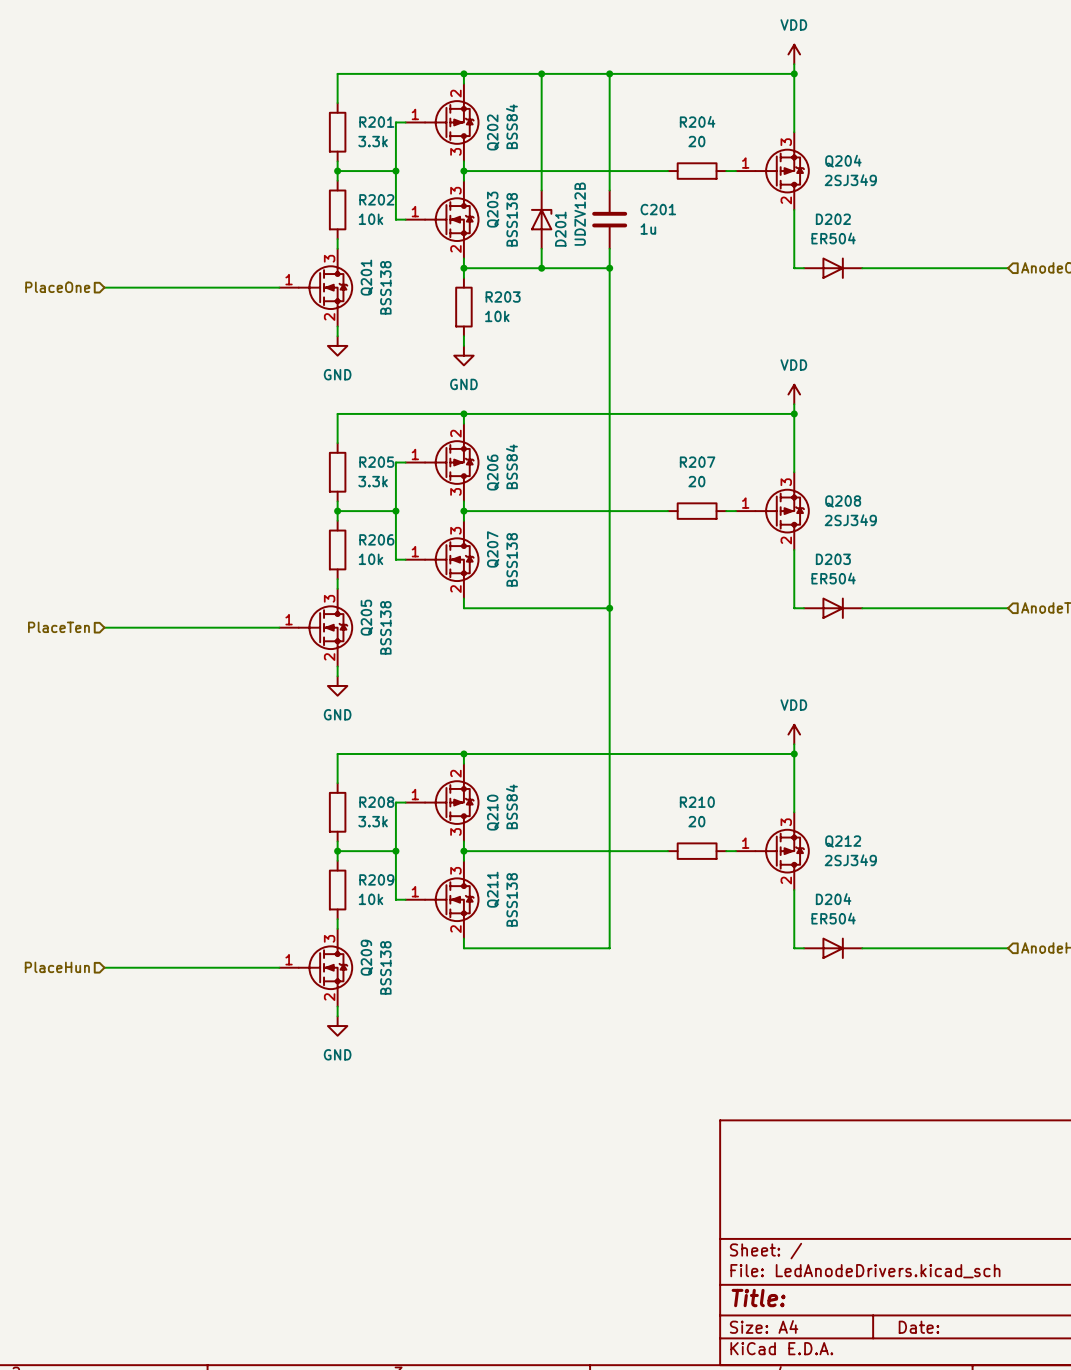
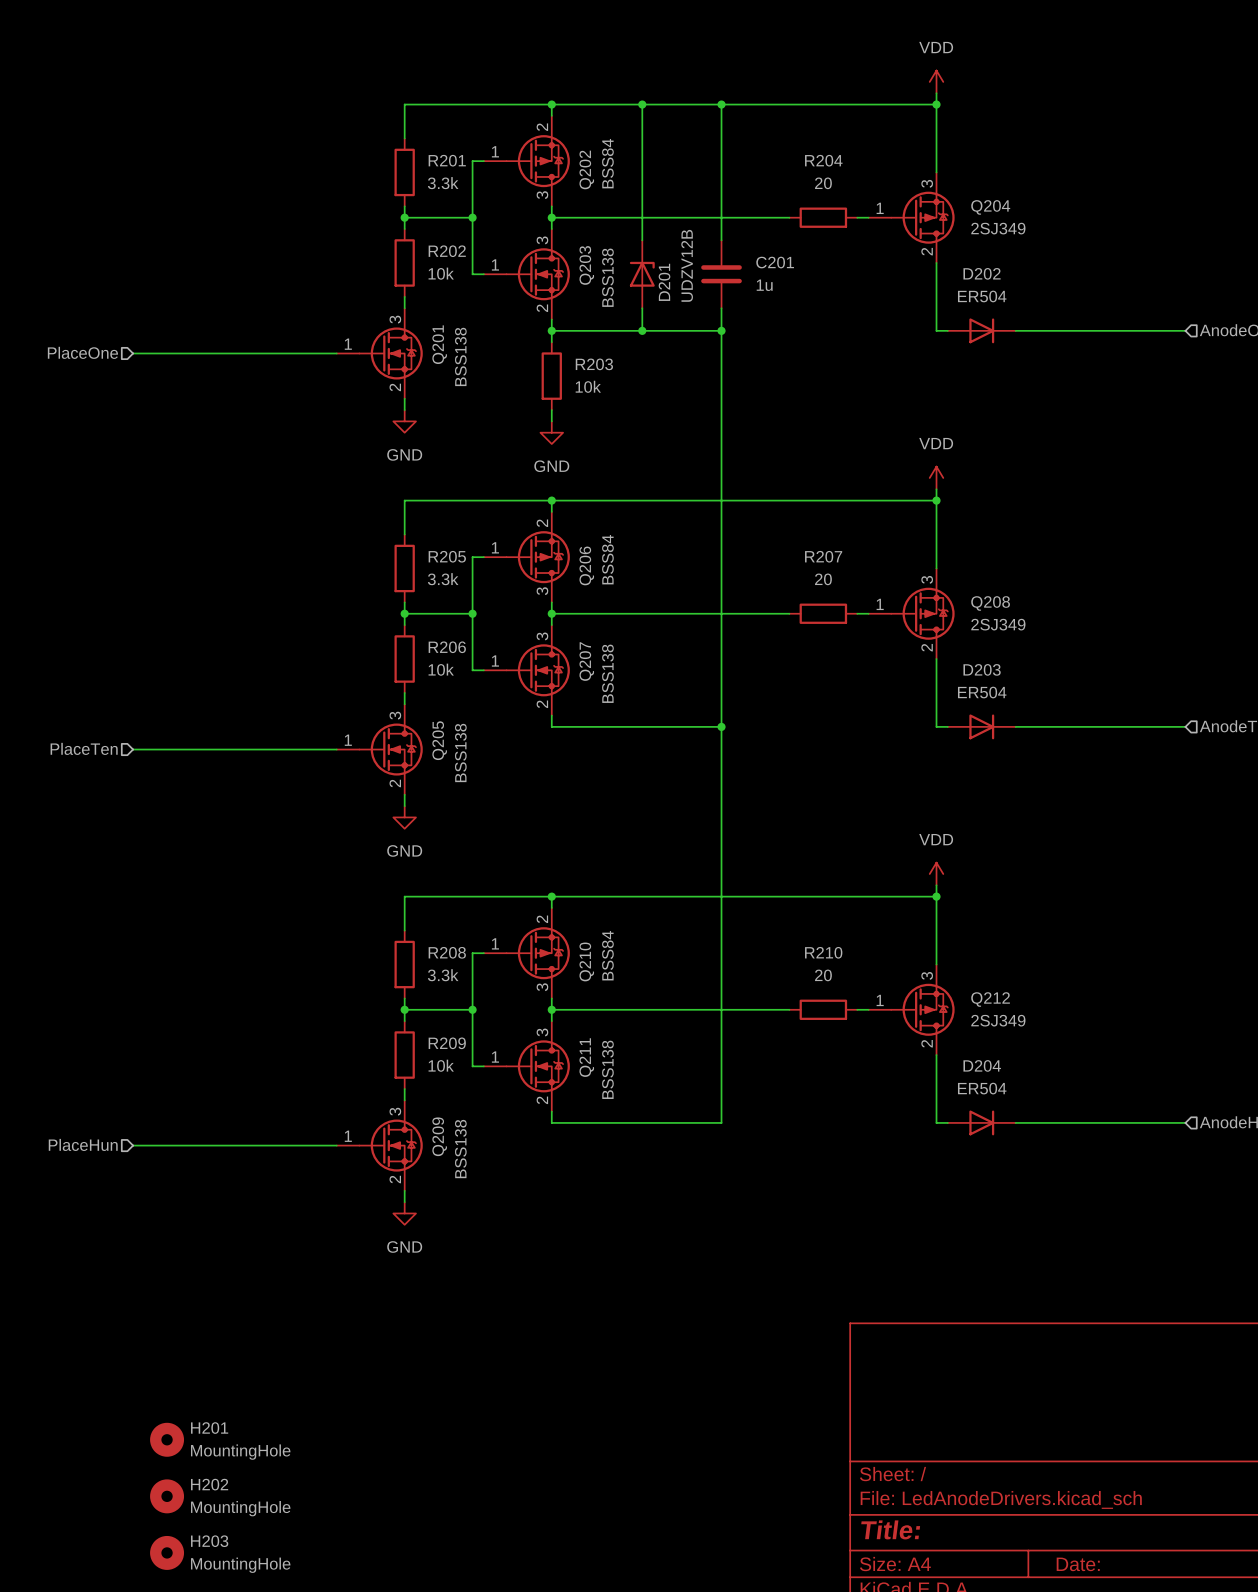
H201: none -> MountingHole (167, 1439)
H202: none -> MountingHole (167, 1496)
H203: none -> MountingHole (167, 1552)

